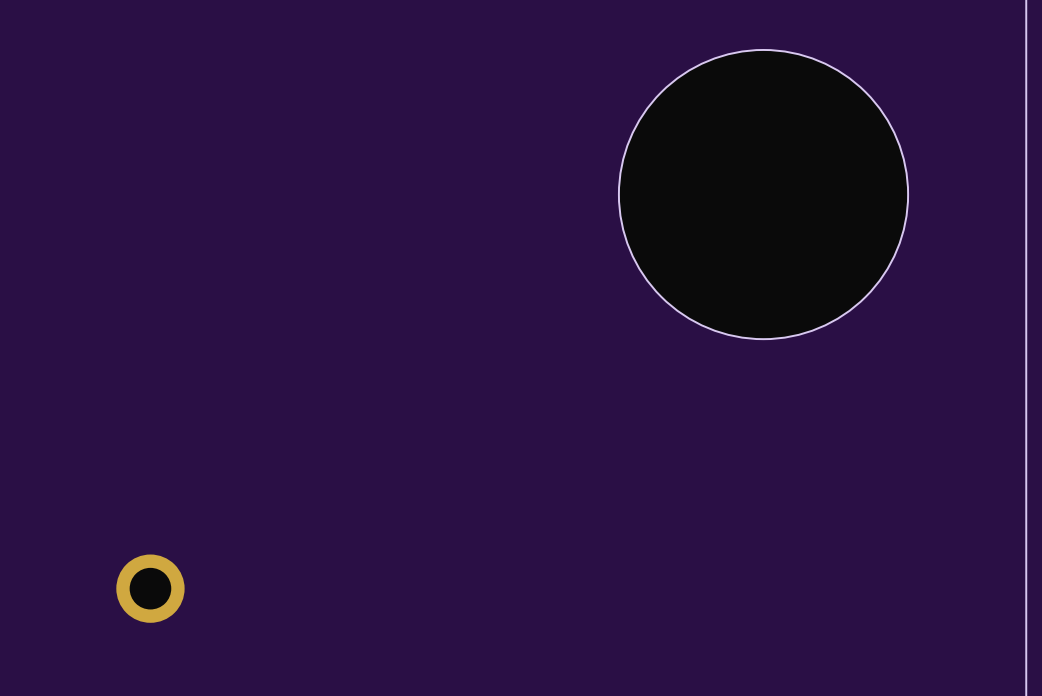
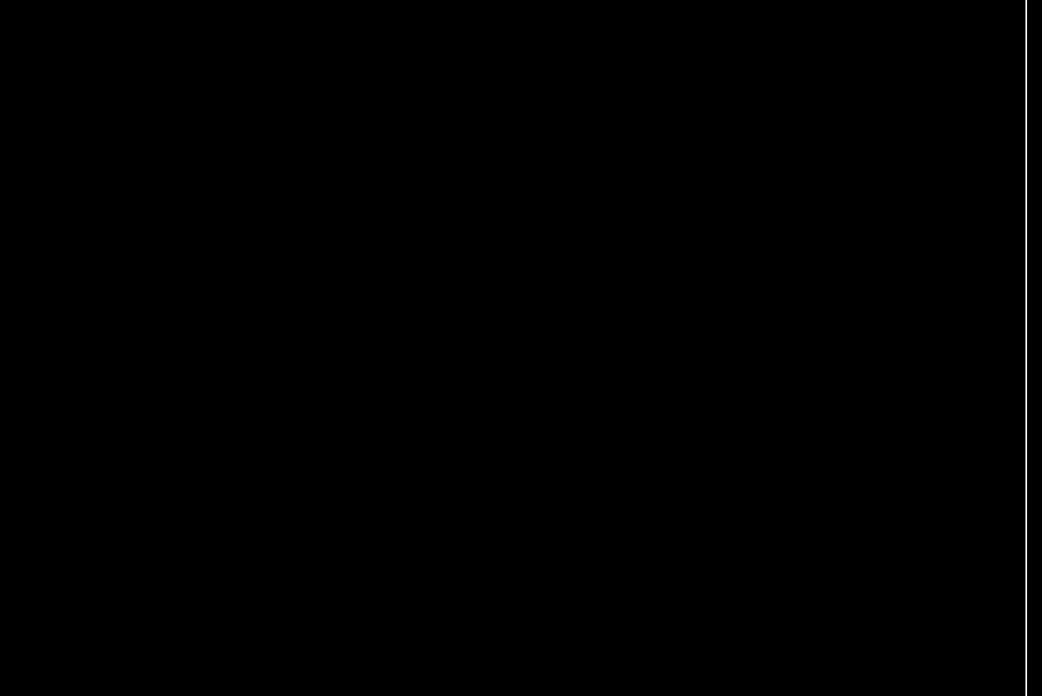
part: (763, 194) -> none
via: (150, 588) -> none

